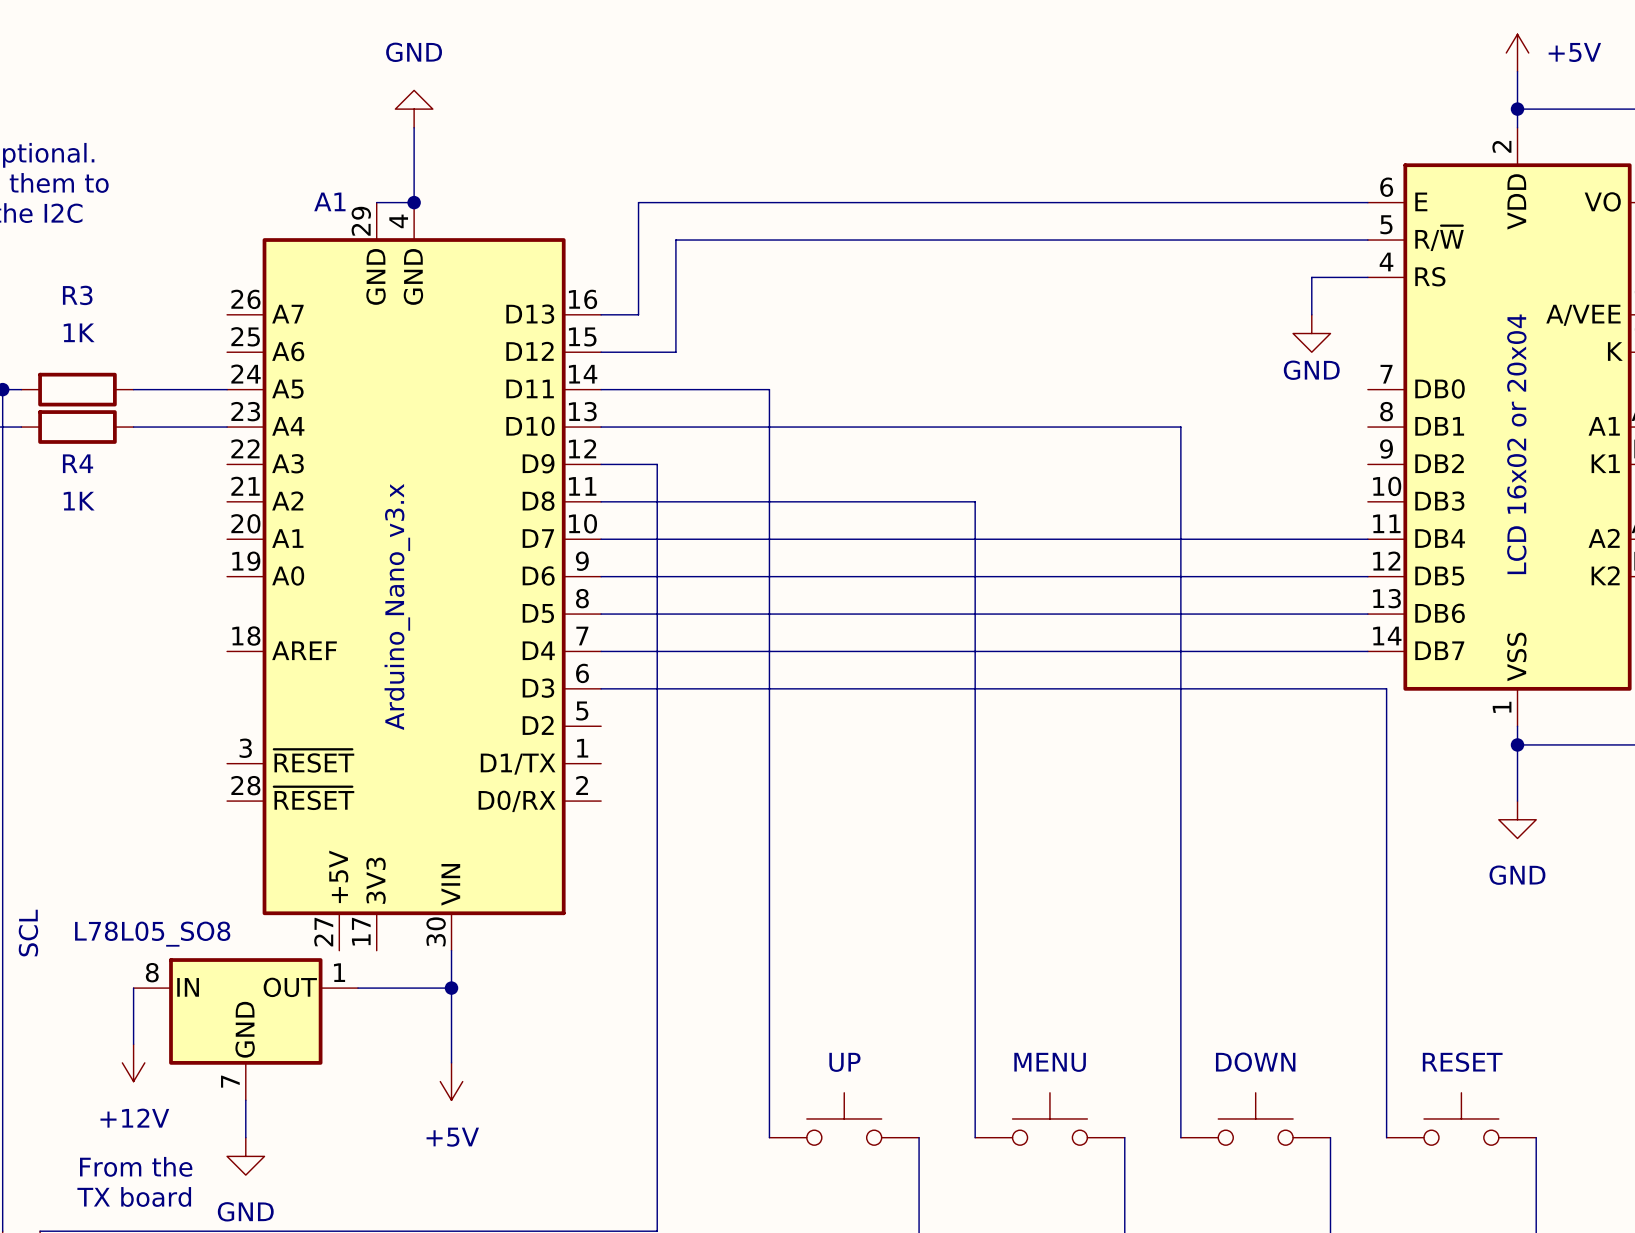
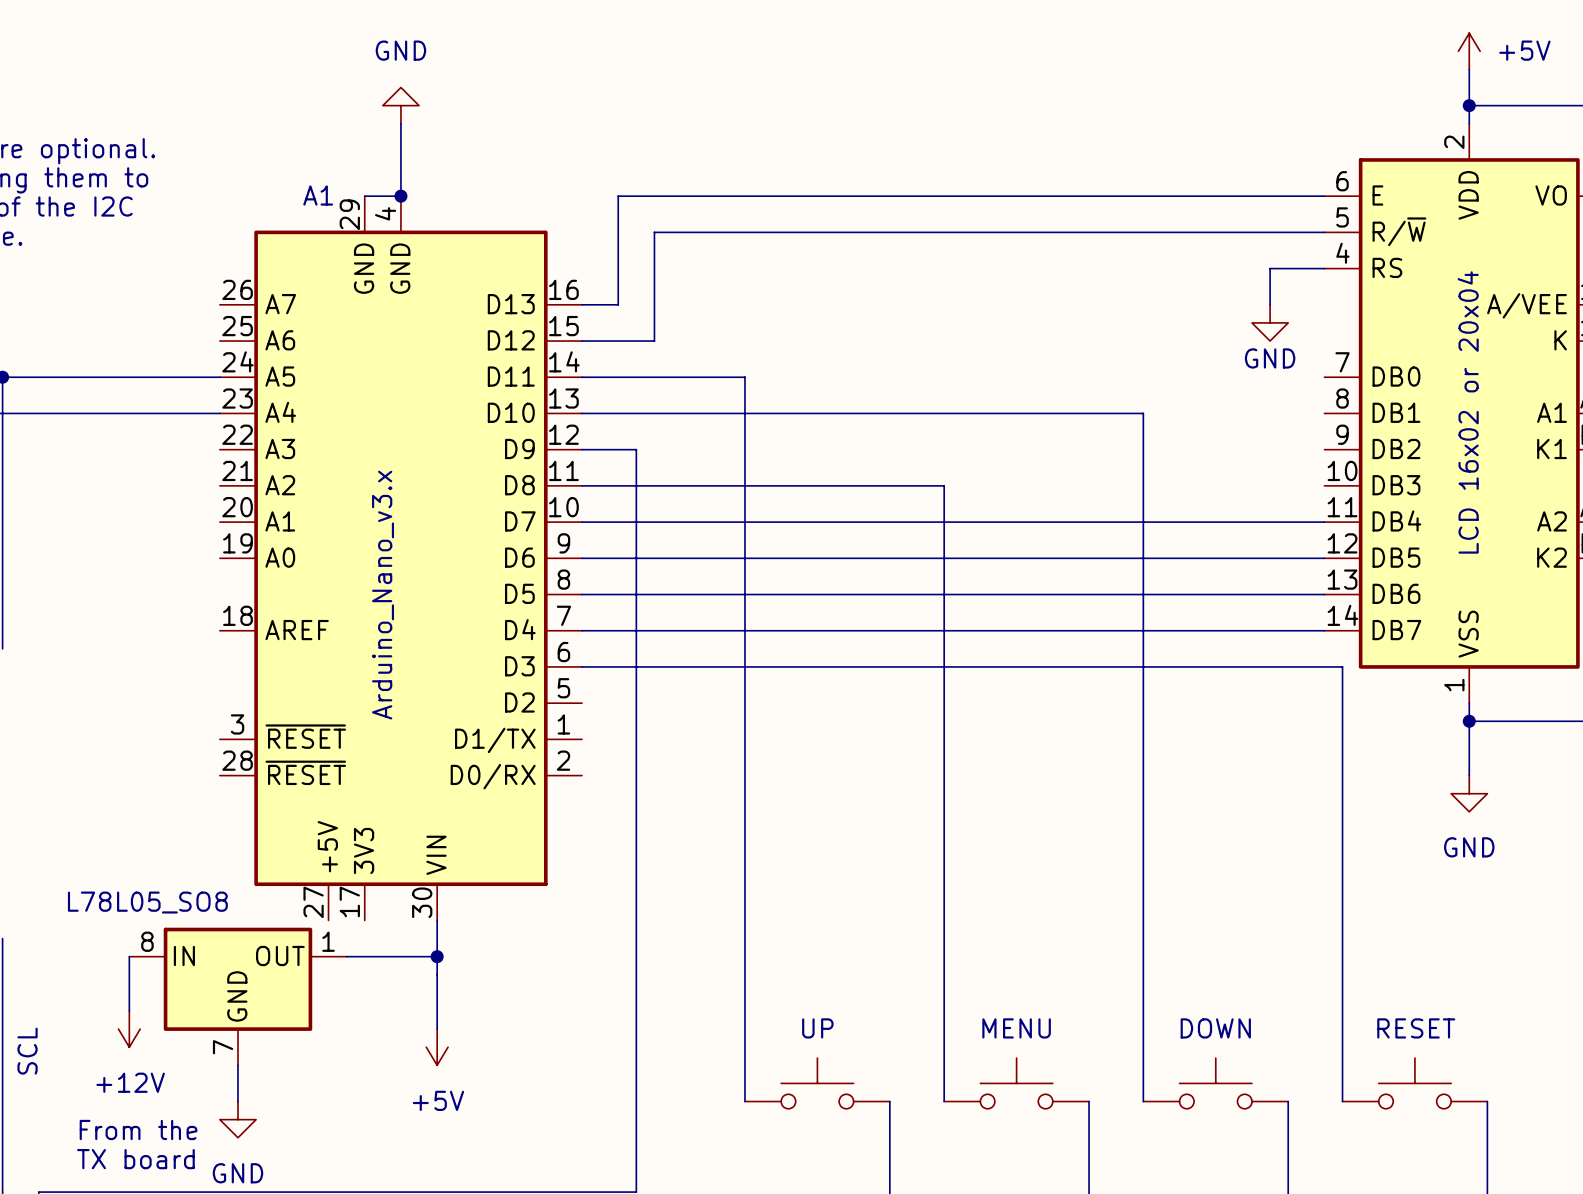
wire: none -> (20, 377) (129, 377)
R3: 1K (77, 389) -> none
wire: none -> (20, 413) (129, 413)
R4: 1K (77, 427) -> none
wire: (2, 670) (2, 969) -> none
text position: SCL (28, 933) -> SCL (27, 1051)

